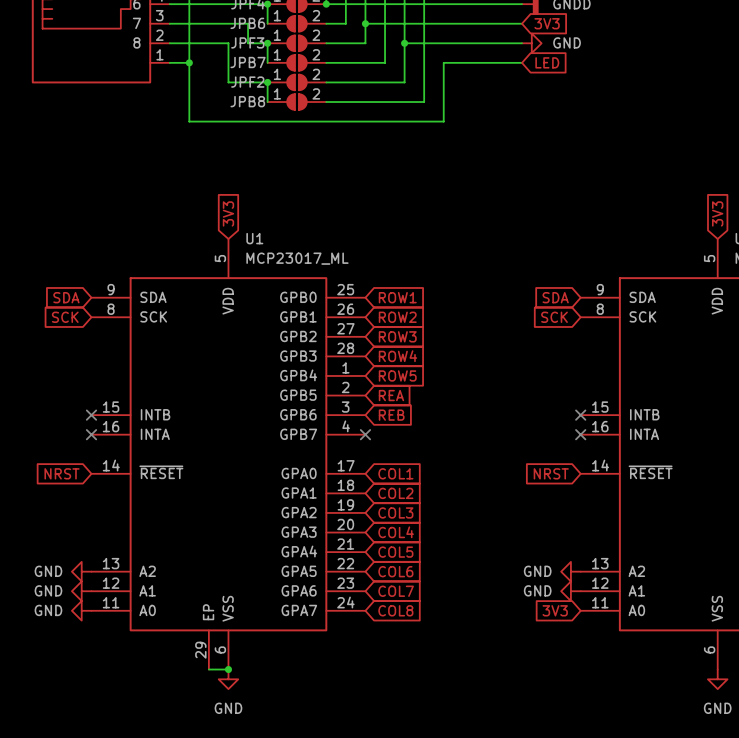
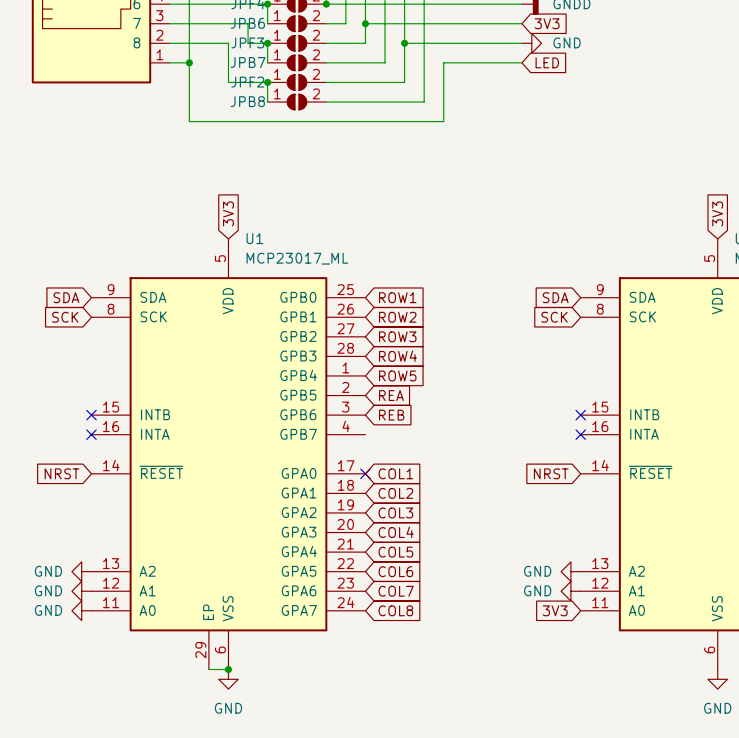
no-connect mark position: (365, 434) -> (365, 473)

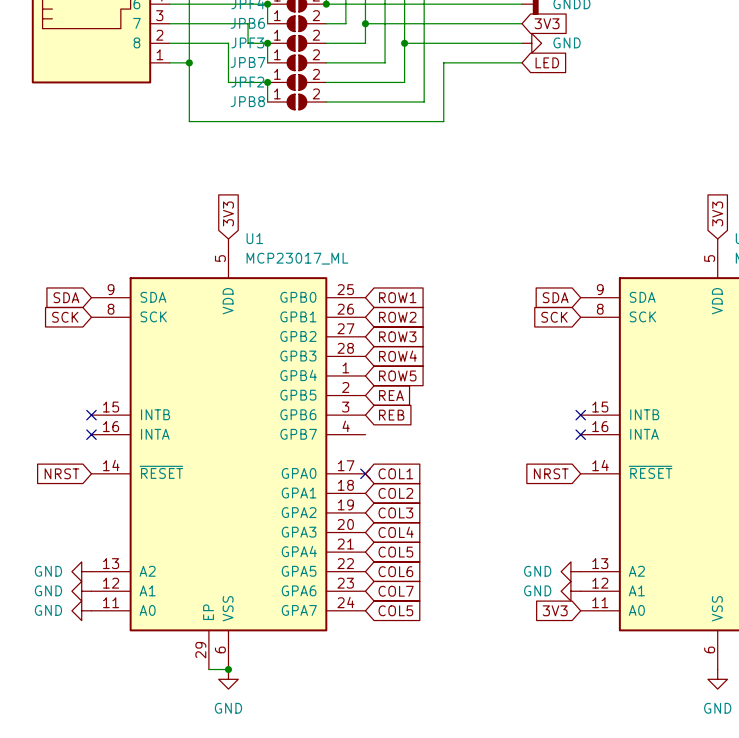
global label: COL8 (395, 610) -> COL5 (395, 610)

